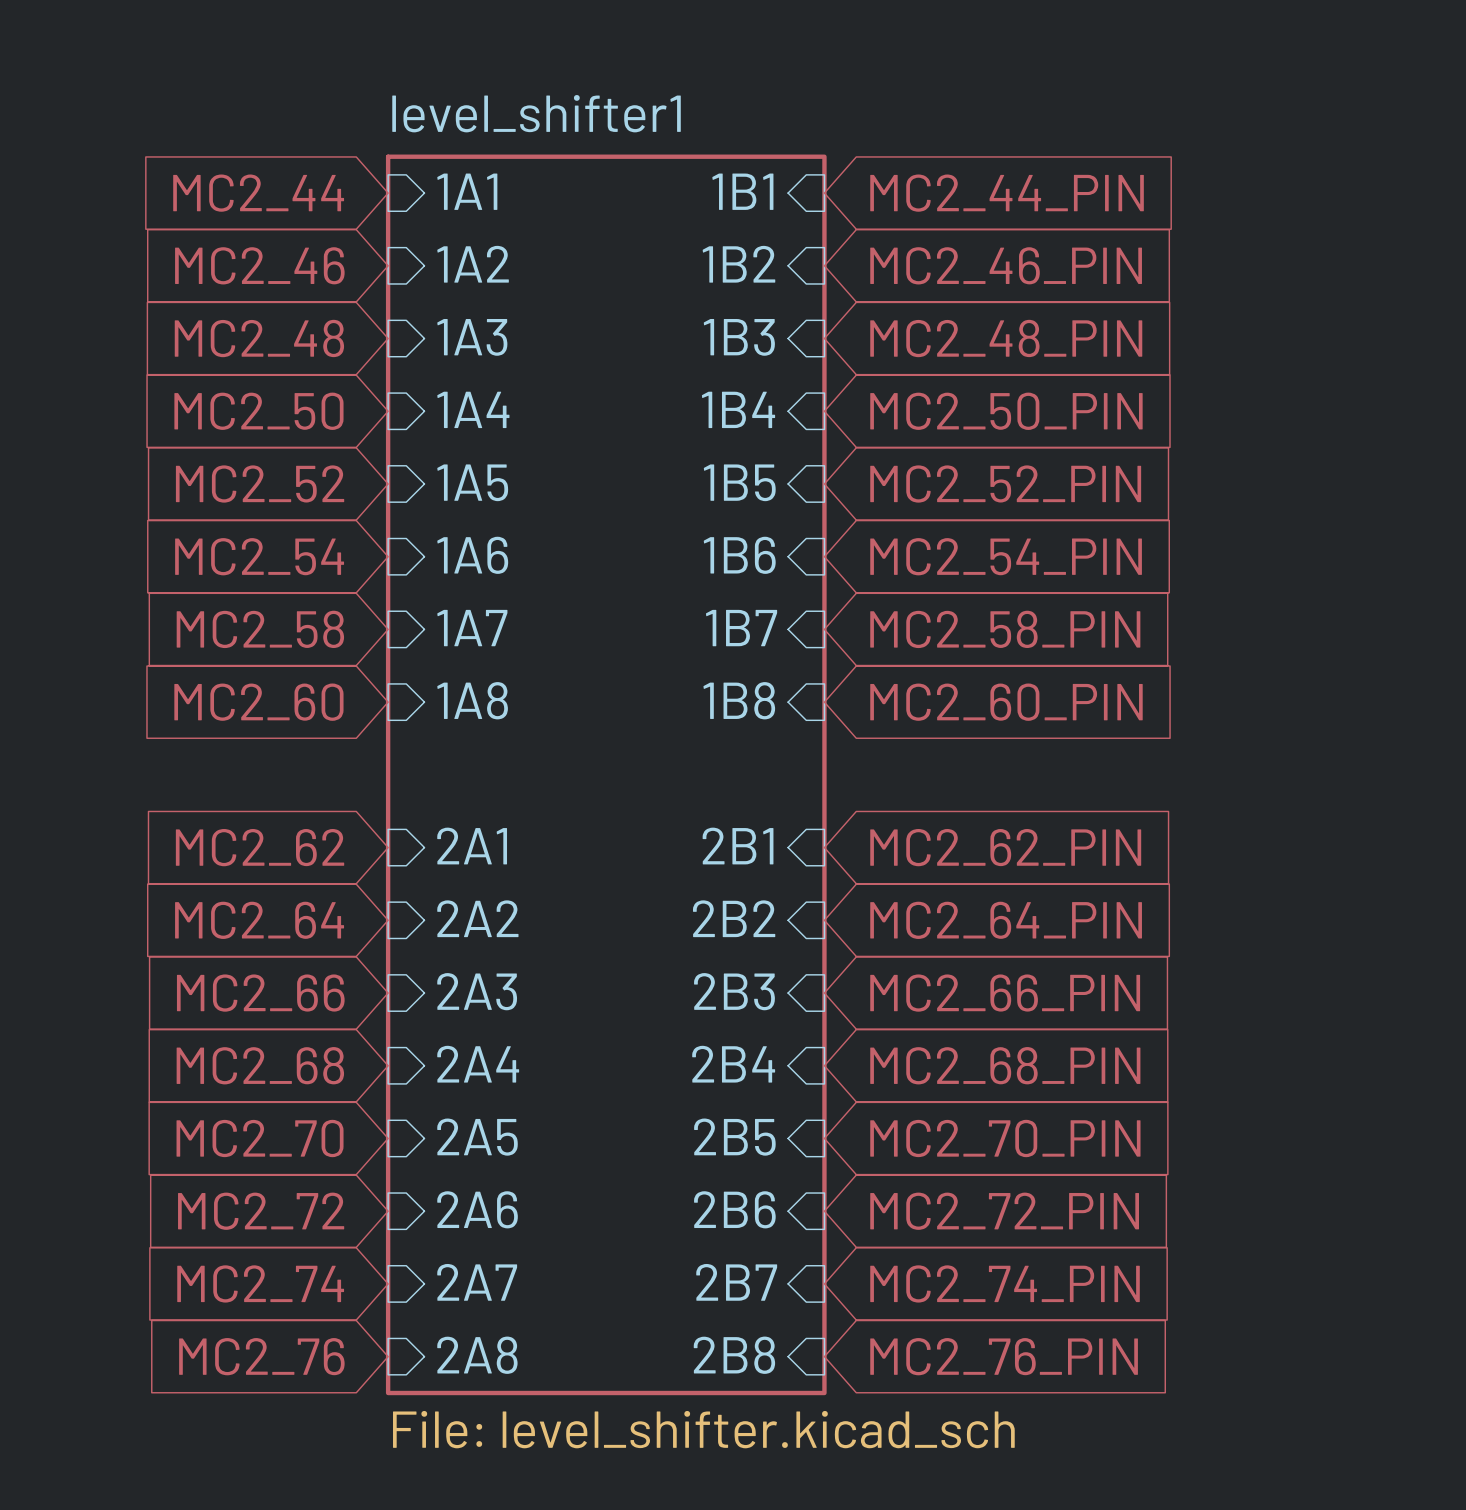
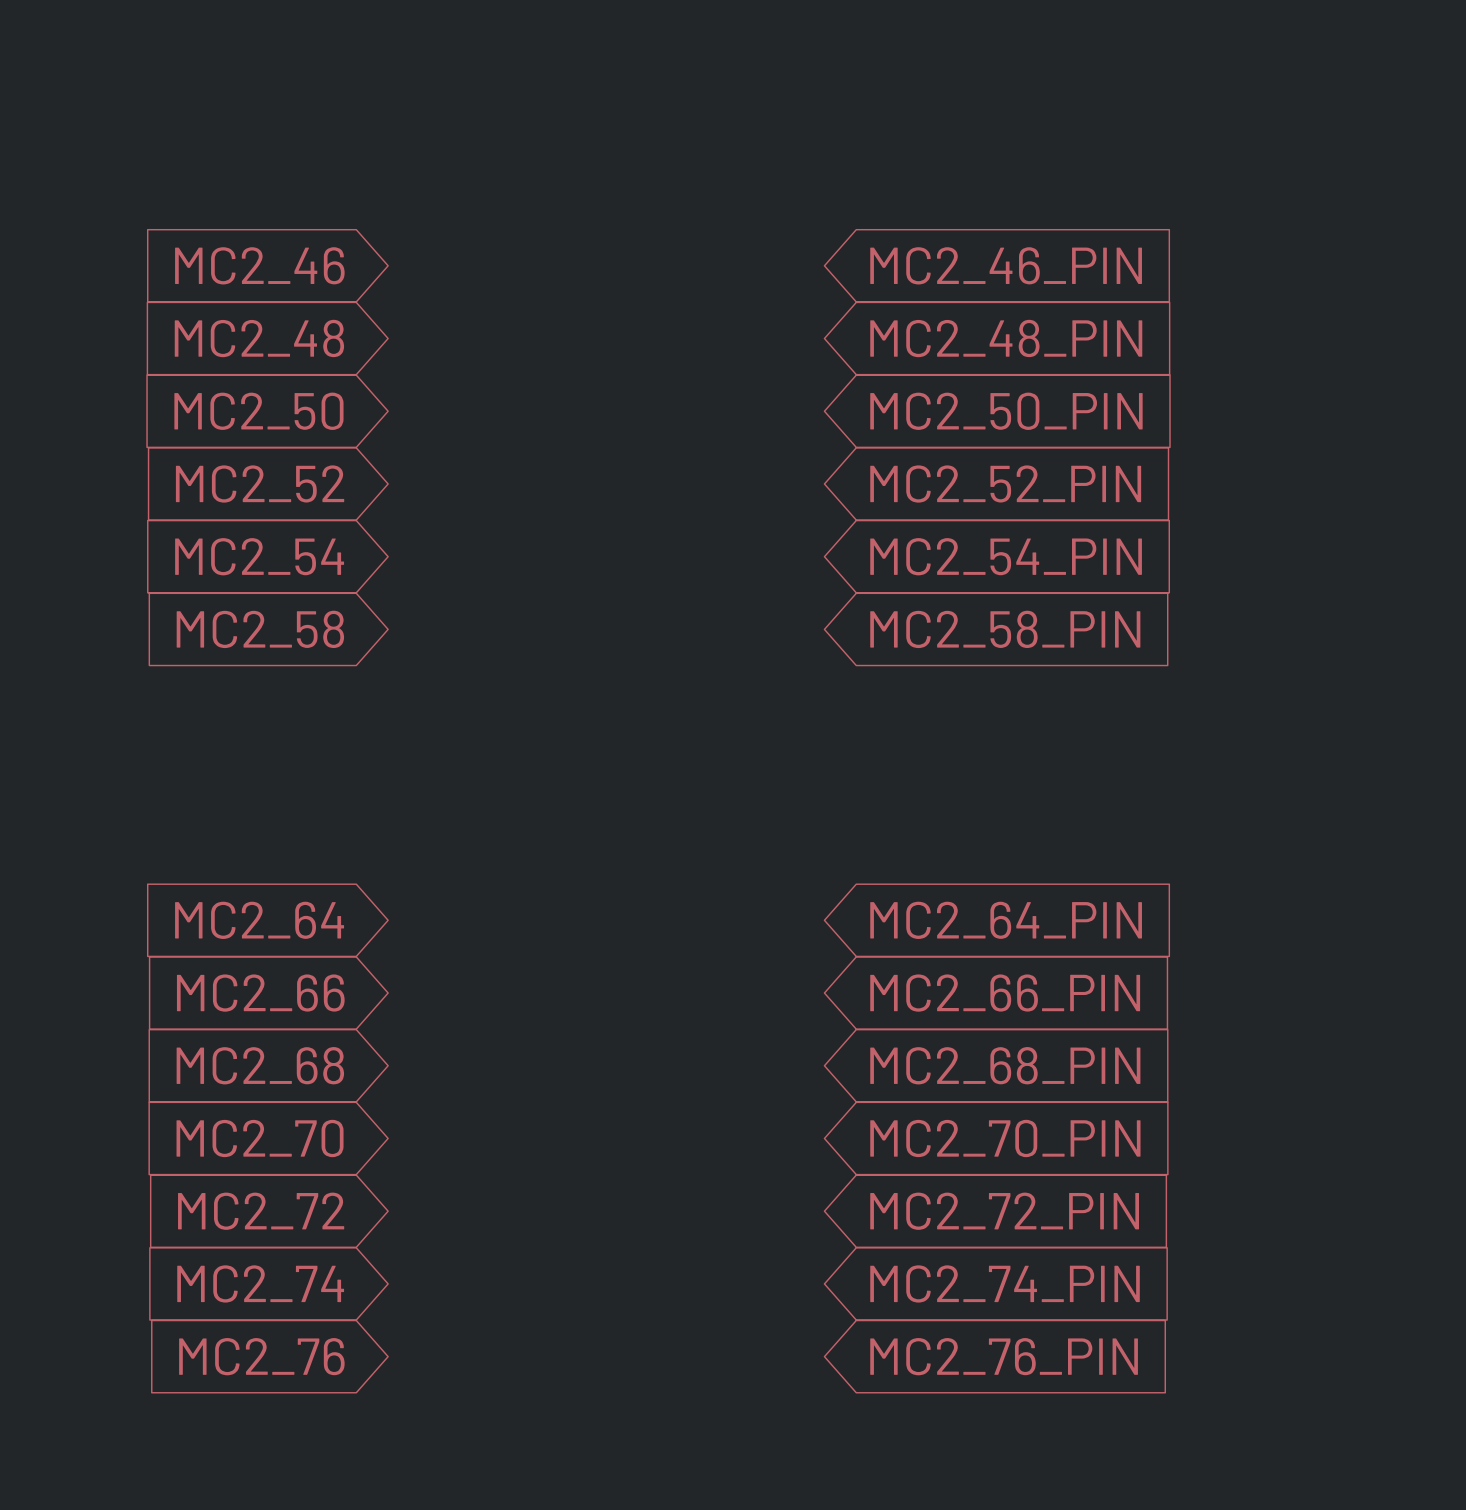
sheet pin: 1A1 (467, 191) -> none
sheet pin: 1B1 (742, 191) -> none
global label: MC2_44 (258, 193) -> none
global label: MC2_44_PIN (1007, 193) -> none
sheet pin: 1A2 (473, 264) -> none
sheet pin: 1B2 (738, 264) -> none
sheet pin: 1A3 (472, 337) -> none
sheet pin: 1B3 (739, 337) -> none
sheet pin: 1A4 (473, 409) -> none
sheet pin: 1B4 (738, 409) -> none
sheet pin: 1A5 (472, 482) -> none
sheet pin: 1B5 (739, 482) -> none
sheet pin: 1A6 (472, 555) -> none
sheet pin: 1B6 (739, 555) -> none
sheet pin: 1A7 (472, 628) -> none
sheet pin: 1B7 (741, 628) -> none
sheet pin: 1A8 (472, 700) -> none
sheet pin: 1B8 (739, 700) -> none
global label: MC2_60 (258, 702) -> none
global label: MC2_60_PIN (1006, 702) -> none
sheet level_shifter1: File: level_shifter.kicad_sch (606, 774) -> none
sheet pin: 2A1 (472, 846) -> none
sheet pin: 2B1 (738, 846) -> none
global label: MC2_62 (260, 847) -> none
global label: MC2_62_PIN (1005, 847) -> none
sheet pin: 2A2 (477, 918) -> none
sheet pin: 2B2 (734, 918) -> none
sheet pin: 2A3 (477, 991) -> none
sheet pin: 2B3 (734, 991) -> none
sheet pin: 2A4 (478, 1064) -> none
sheet pin: 2B4 (733, 1064) -> none
sheet pin: 2A5 (477, 1137) -> none
sheet pin: 2B5 (734, 1137) -> none
sheet pin: 2A6 (477, 1209) -> none
sheet pin: 2B6 (734, 1209) -> none
sheet pin: 2A7 (477, 1282) -> none
sheet pin: 2B7 (736, 1282) -> none
sheet pin: 2A8 (477, 1355) -> none
sheet pin: 2B8 (734, 1355) -> none

